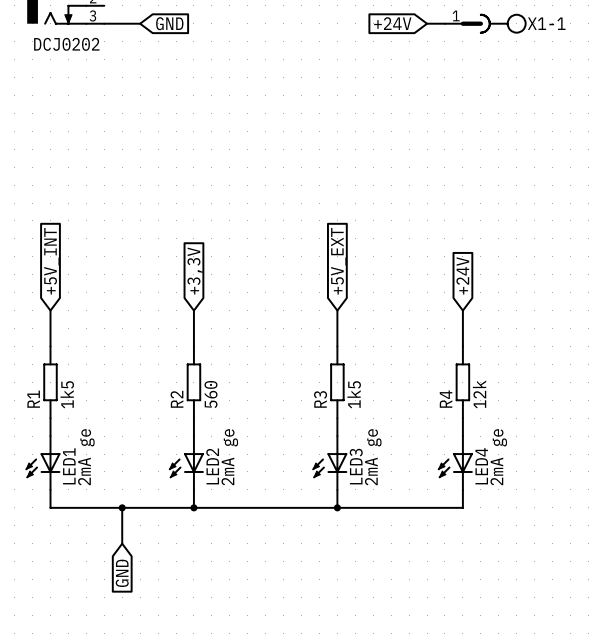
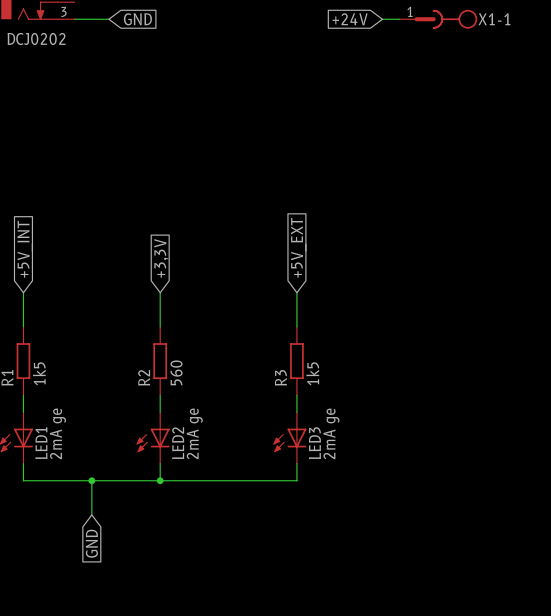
global label: +24V (462, 275) -> none
wire: (462, 310) (462, 346) -> none
R4: 12k (462, 382) -> none
wire: (462, 418) (462, 436) -> none
LED4: 2mA ge (455, 463) -> none
wire: (462, 489) (462, 507) (337, 507) -> none
junction: (337, 507) -> none

